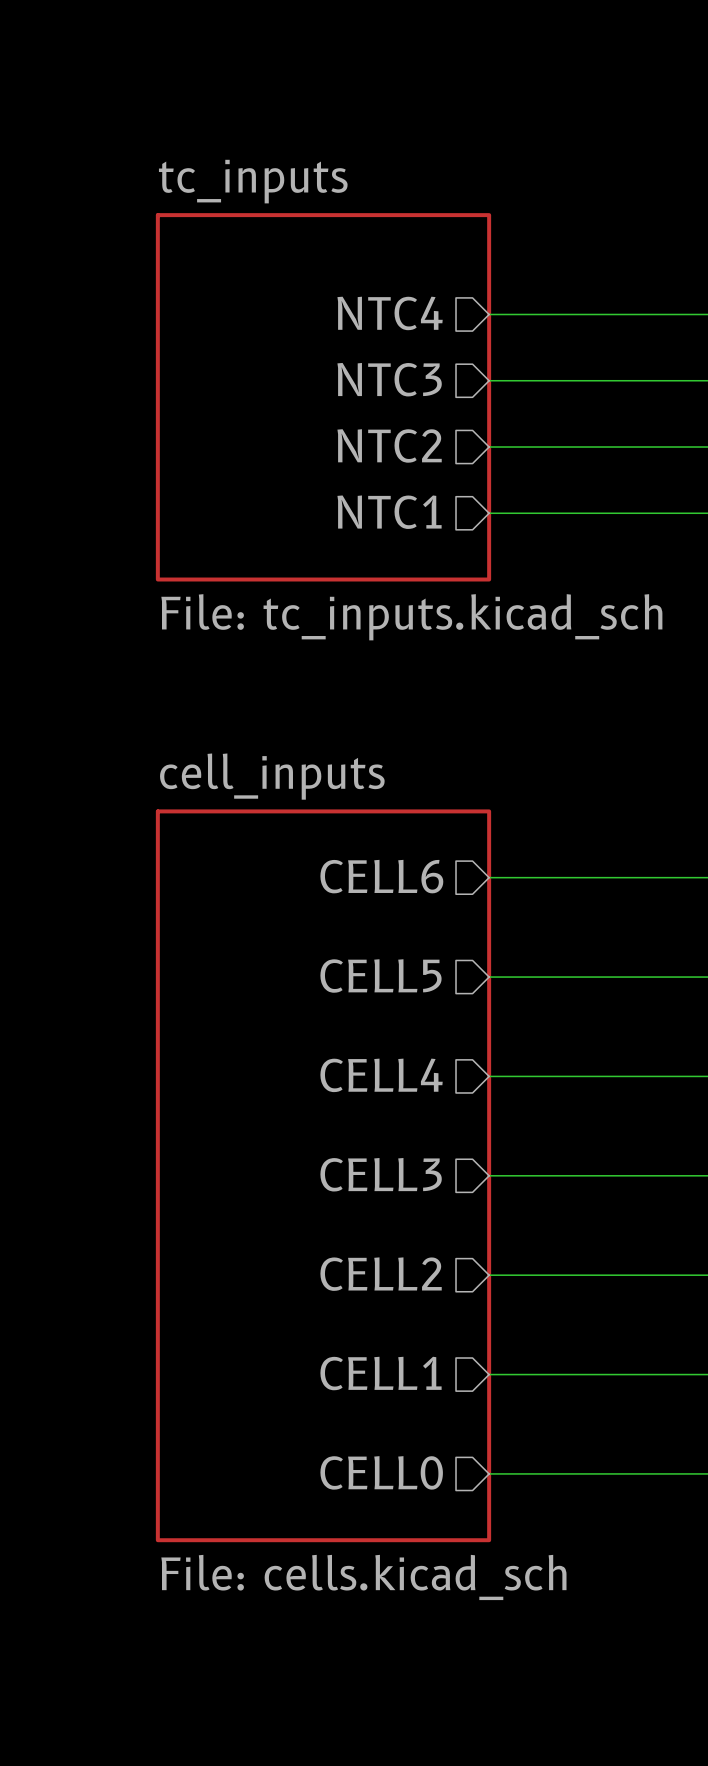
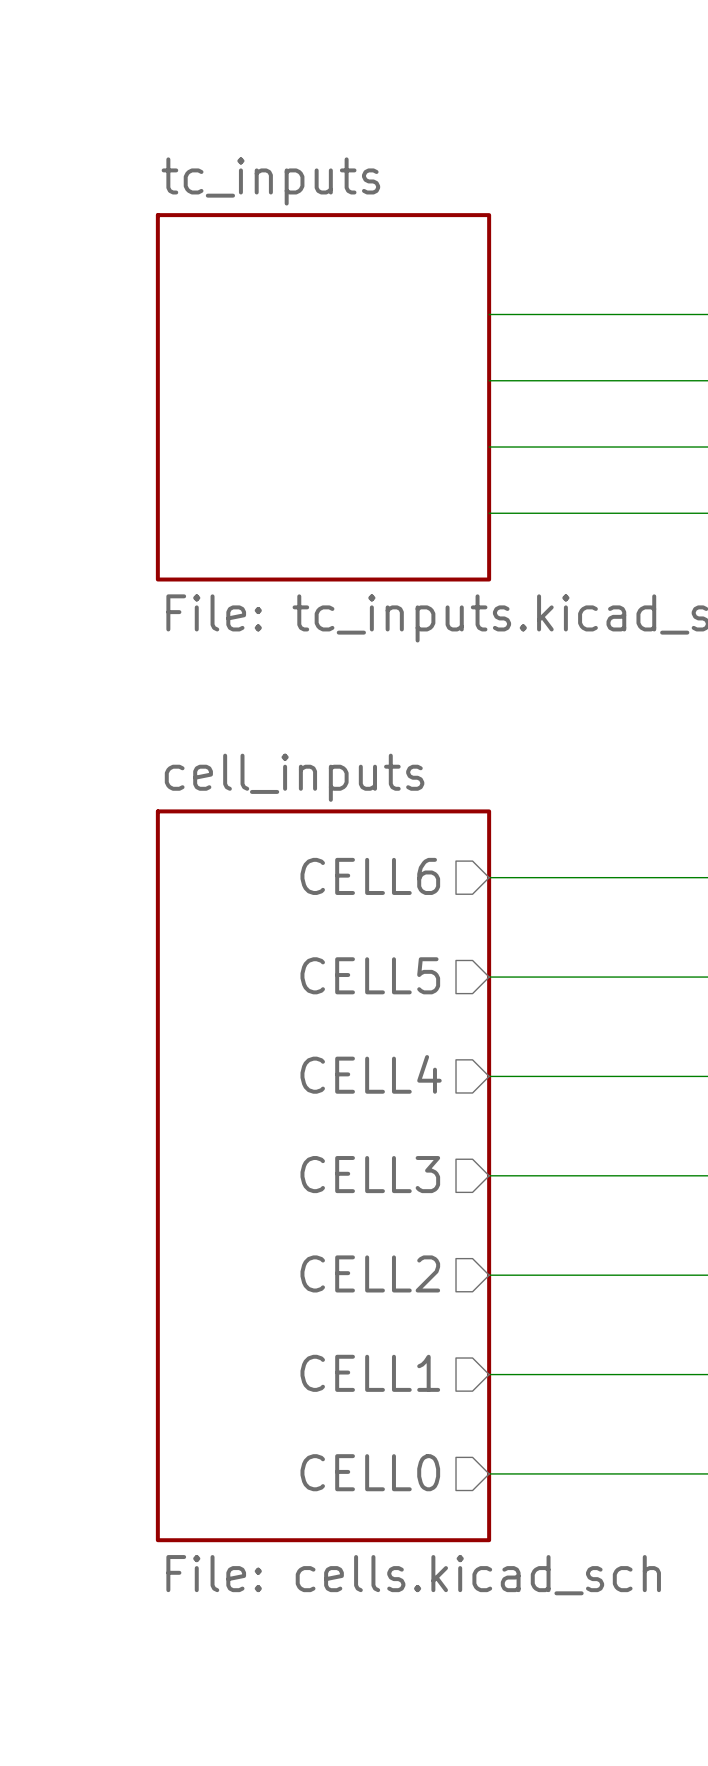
sheet pin: NTC4 (390, 313) -> none
sheet pin: NTC3 (389, 379) -> none
sheet pin: NTC2 (389, 445) -> none
sheet pin: NTC1 (389, 512) -> none

